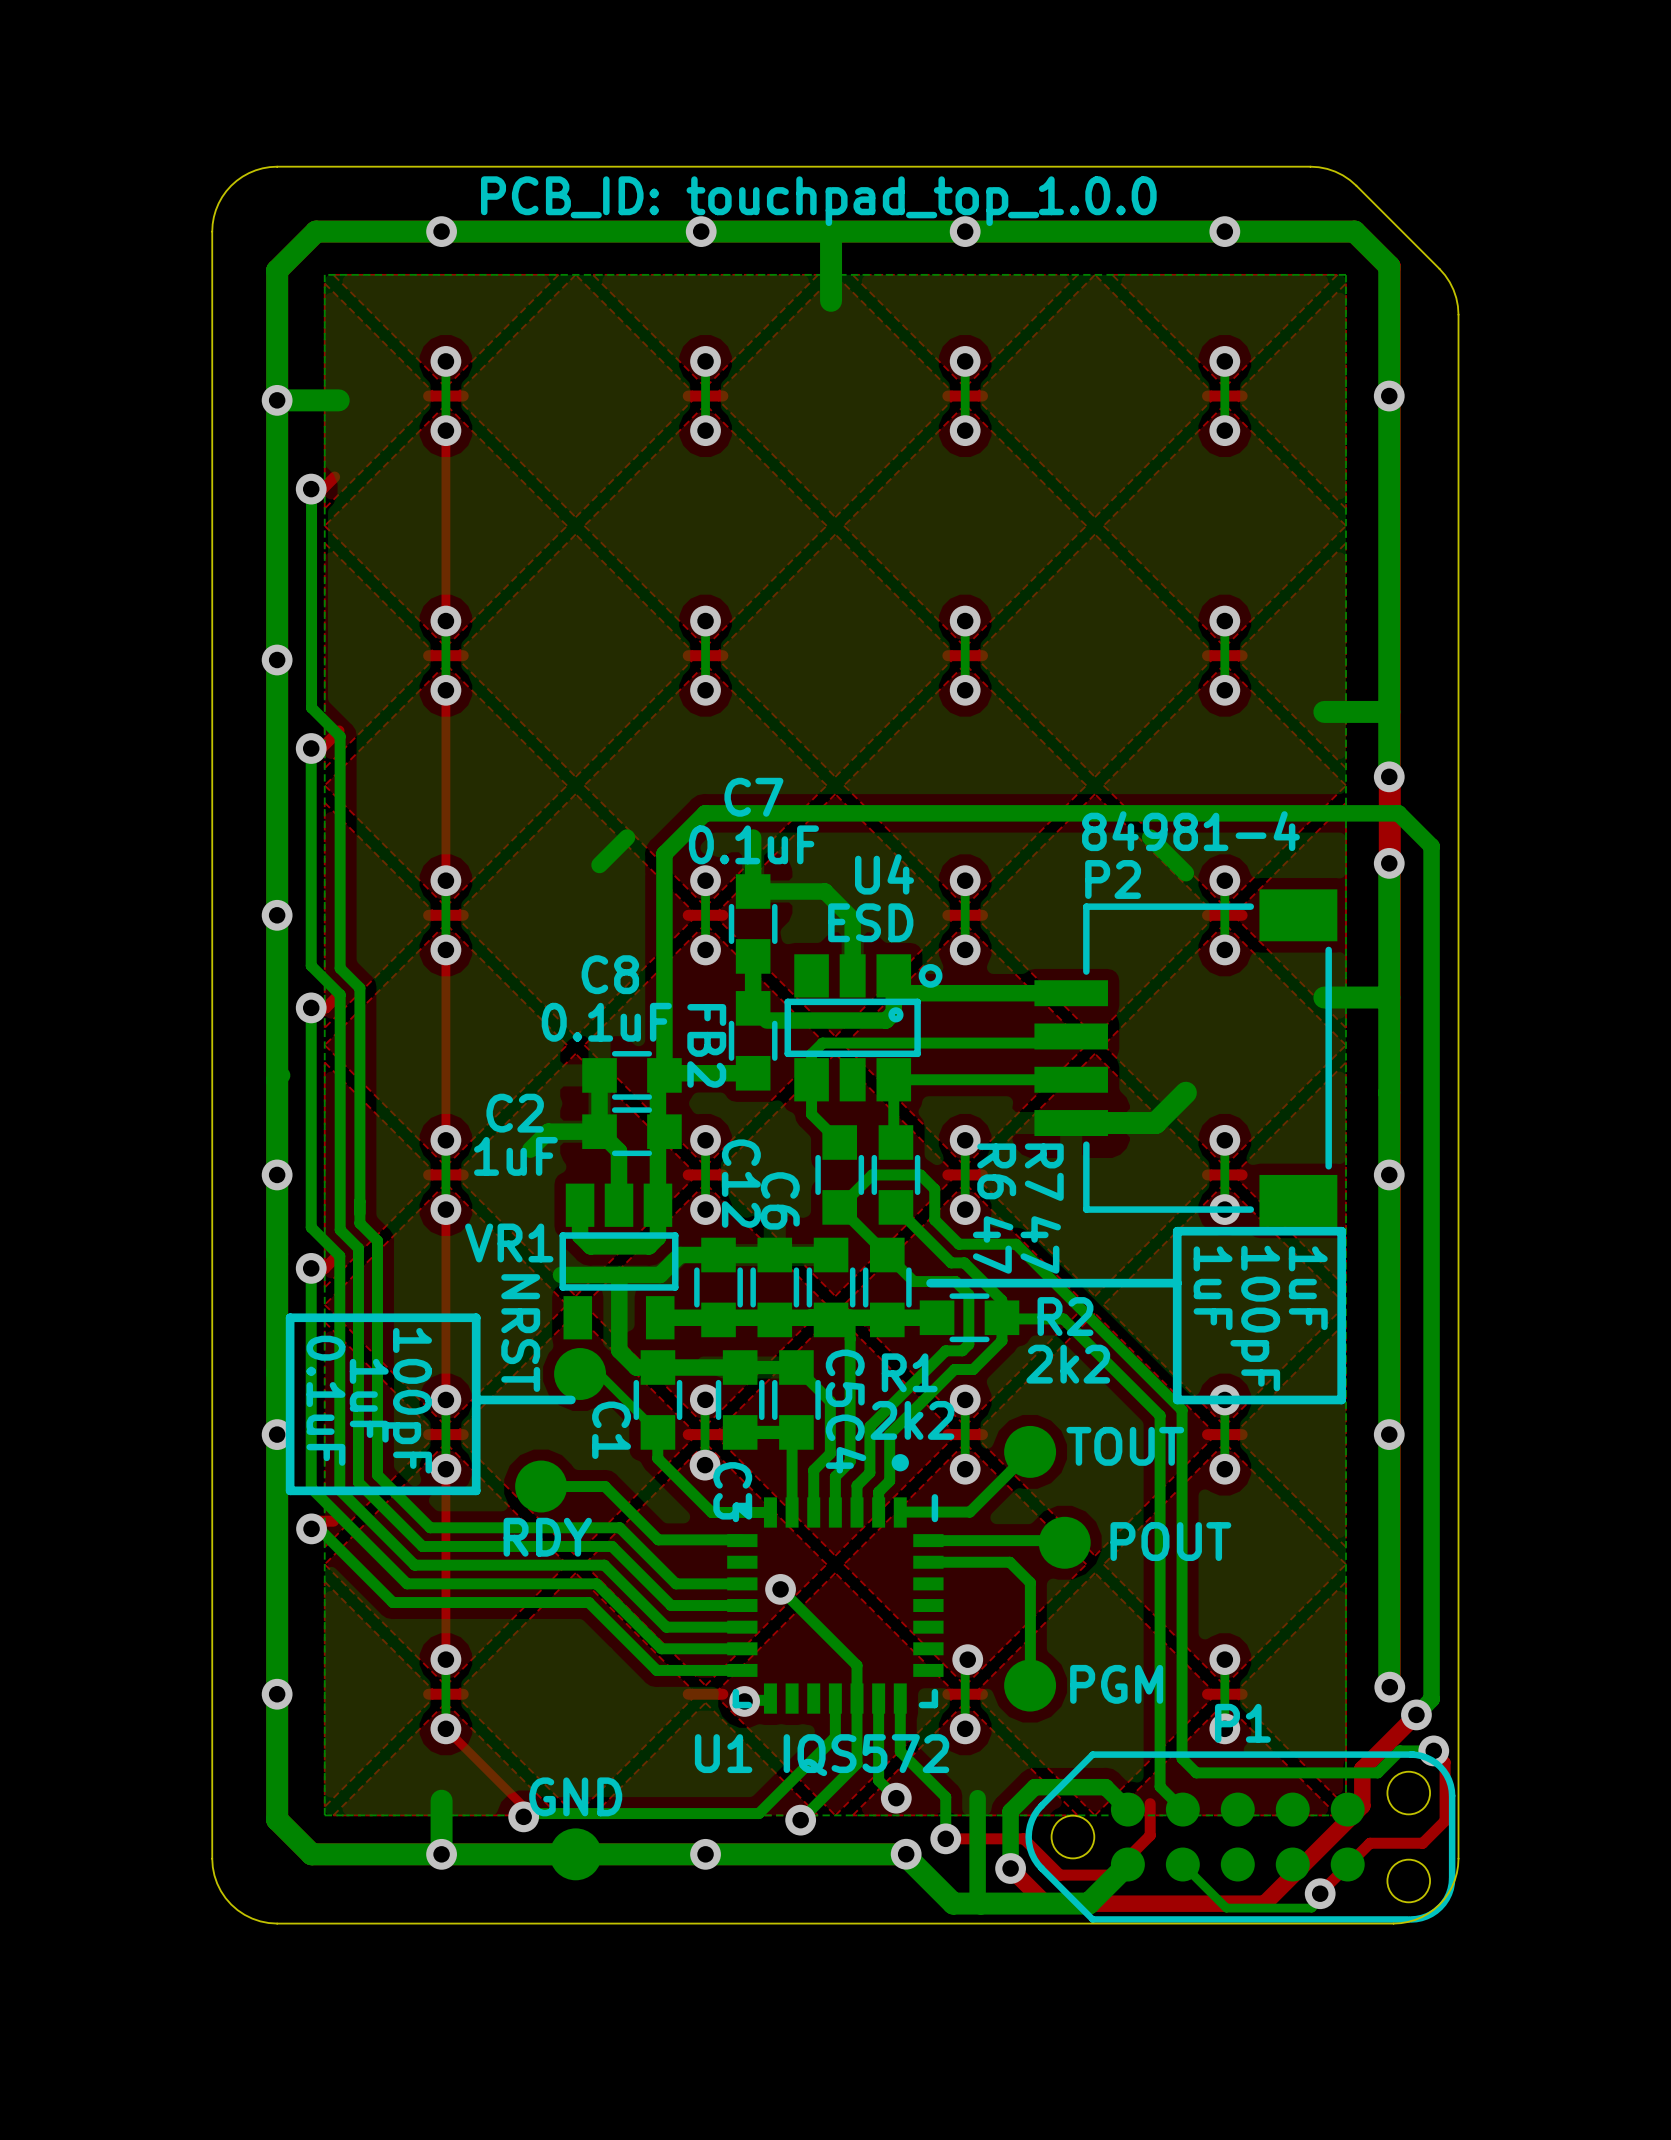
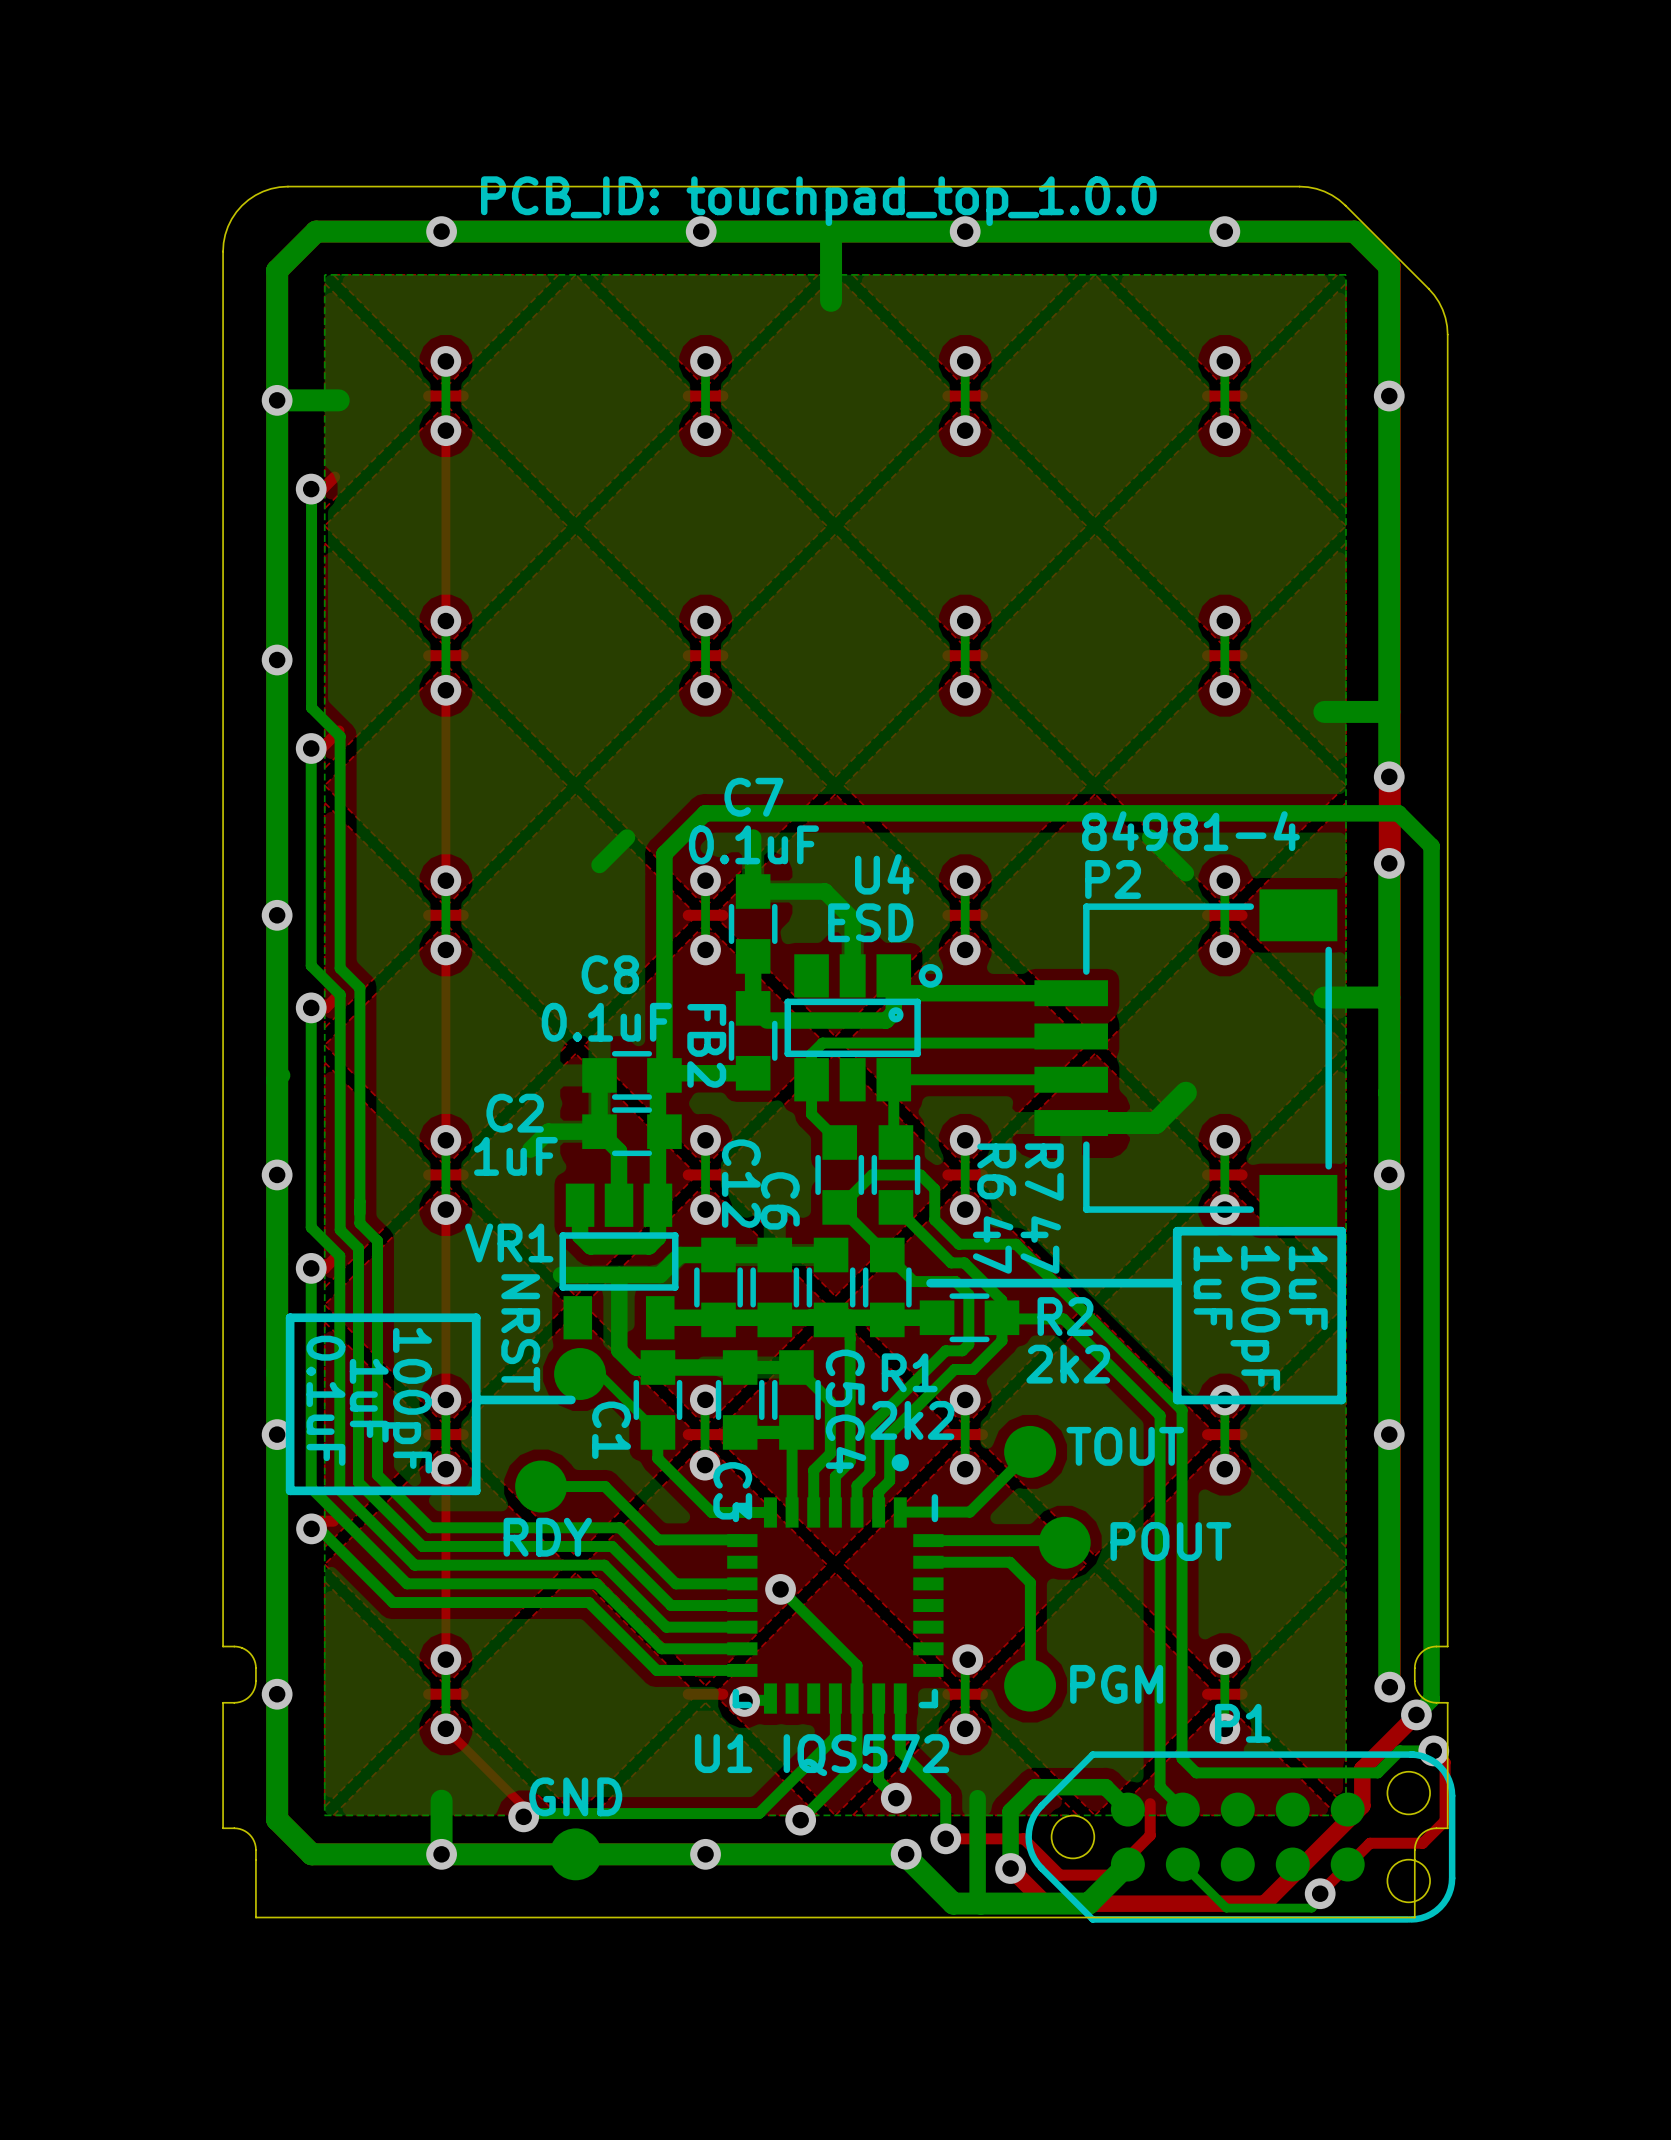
board edge: (1310, 166) (277, 166) (255, 170) (242, 176) (231, 185) (222, 197) (213, 217) (212, 231) (212, 1858) (214, 1875) (220, 1891) (231, 1904) (244, 1914) (260, 1921) (277, 1923) (1393, 1923) (1415, 1919) (1428, 1913) (1439, 1904) (1448, 1893) (1456, 1873) (1458, 1858) (1457, 306) (1453, 289) (1445, 275) (1356, 185) (1335, 171) (1310, 166) -> (1299, 186) (1324, 191) (1345, 205) (1434, 295) (1442, 309) (1447, 326) (1447, 1646) (1430, 1647) (1420, 1653) (1415, 1663) (1414, 1681) (1417, 1691) (1425, 1699) (1433, 1702) (1447, 1702) (1447, 1828) (1428, 1829) (1421, 1834) (1416, 1841) (1414, 1917) (255, 1917) (254, 1841) (249, 1834) (242, 1829) (223, 1828) (223, 1702) (237, 1702) (245, 1699) (253, 1691) (255, 1681) (255, 1663) (250, 1653) (240, 1647) (223, 1646) (223, 251) (225, 234) (231, 219) (242, 205) (255, 195) (271, 188) (287, 186) (1299, 186)

